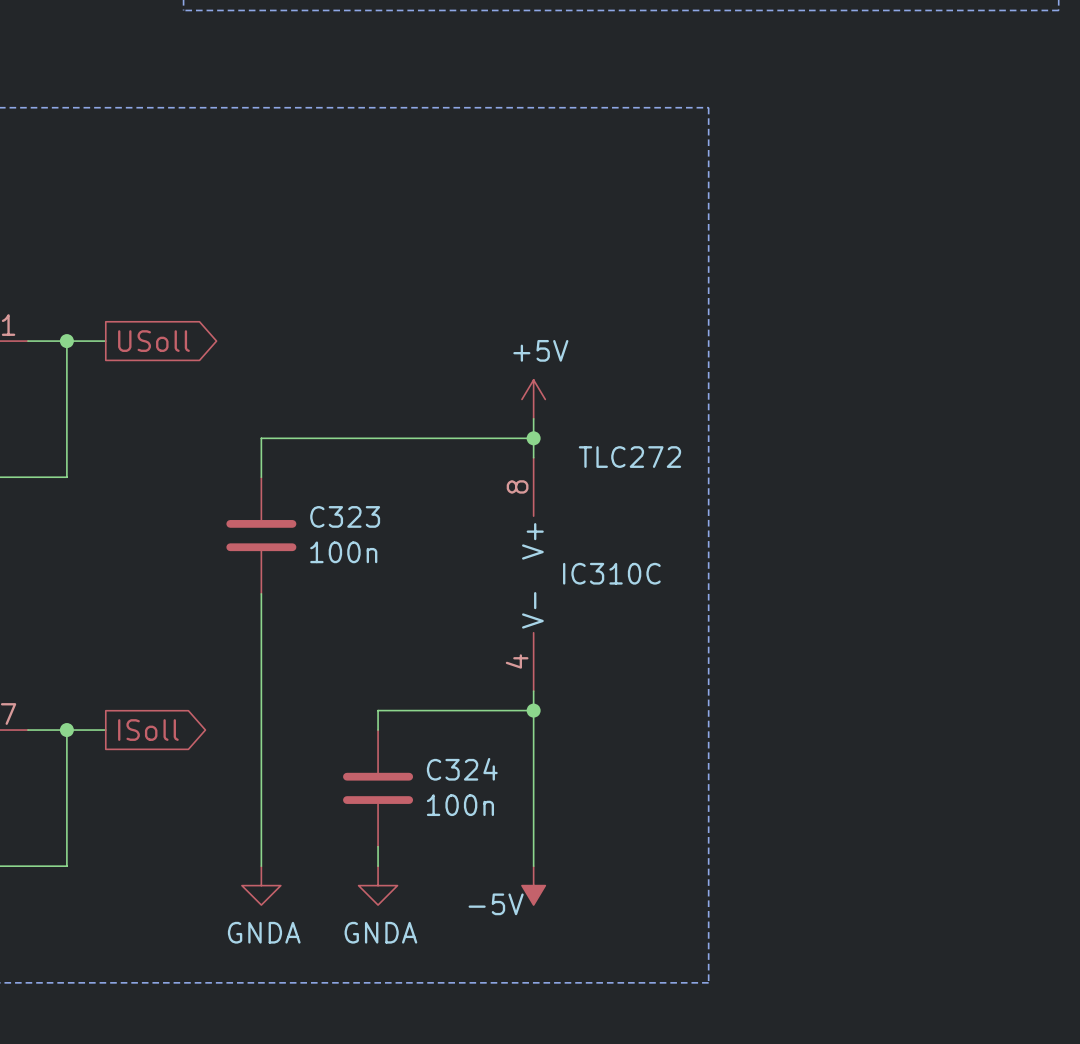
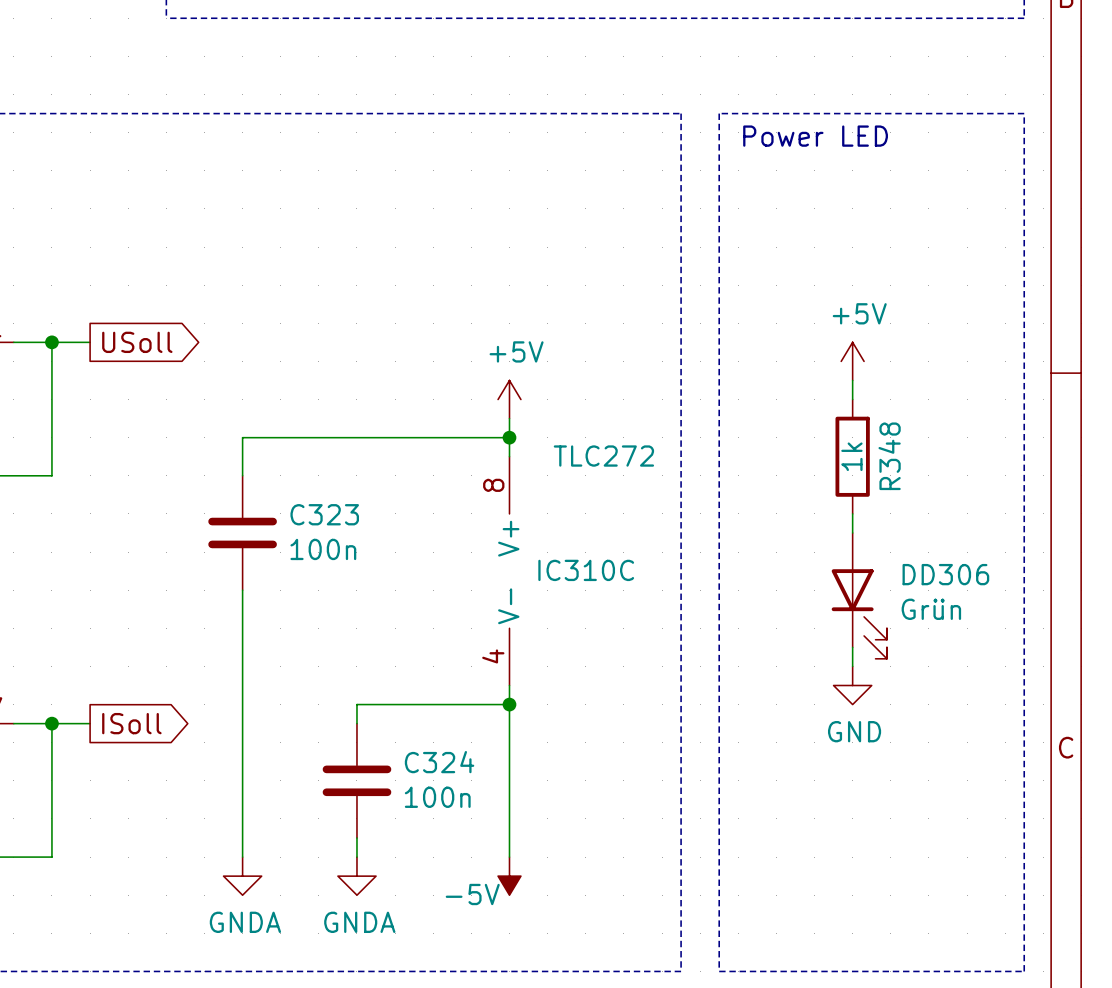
line: none -> (719, 113) (719, 971) (1024, 971) (1024, 113) (719, 113)
text: none -> Power LED (815, 136)
power symbol: none -> +5V (852, 361)
wire: none -> (852, 380) (852, 399)
R348: none -> 1k (852, 456)
wire: none -> (852, 513) (852, 532)
DD306: none -> Grün (859, 595)
wire: none -> (852, 647) (852, 666)
power symbol: none -> GND (852, 685)

